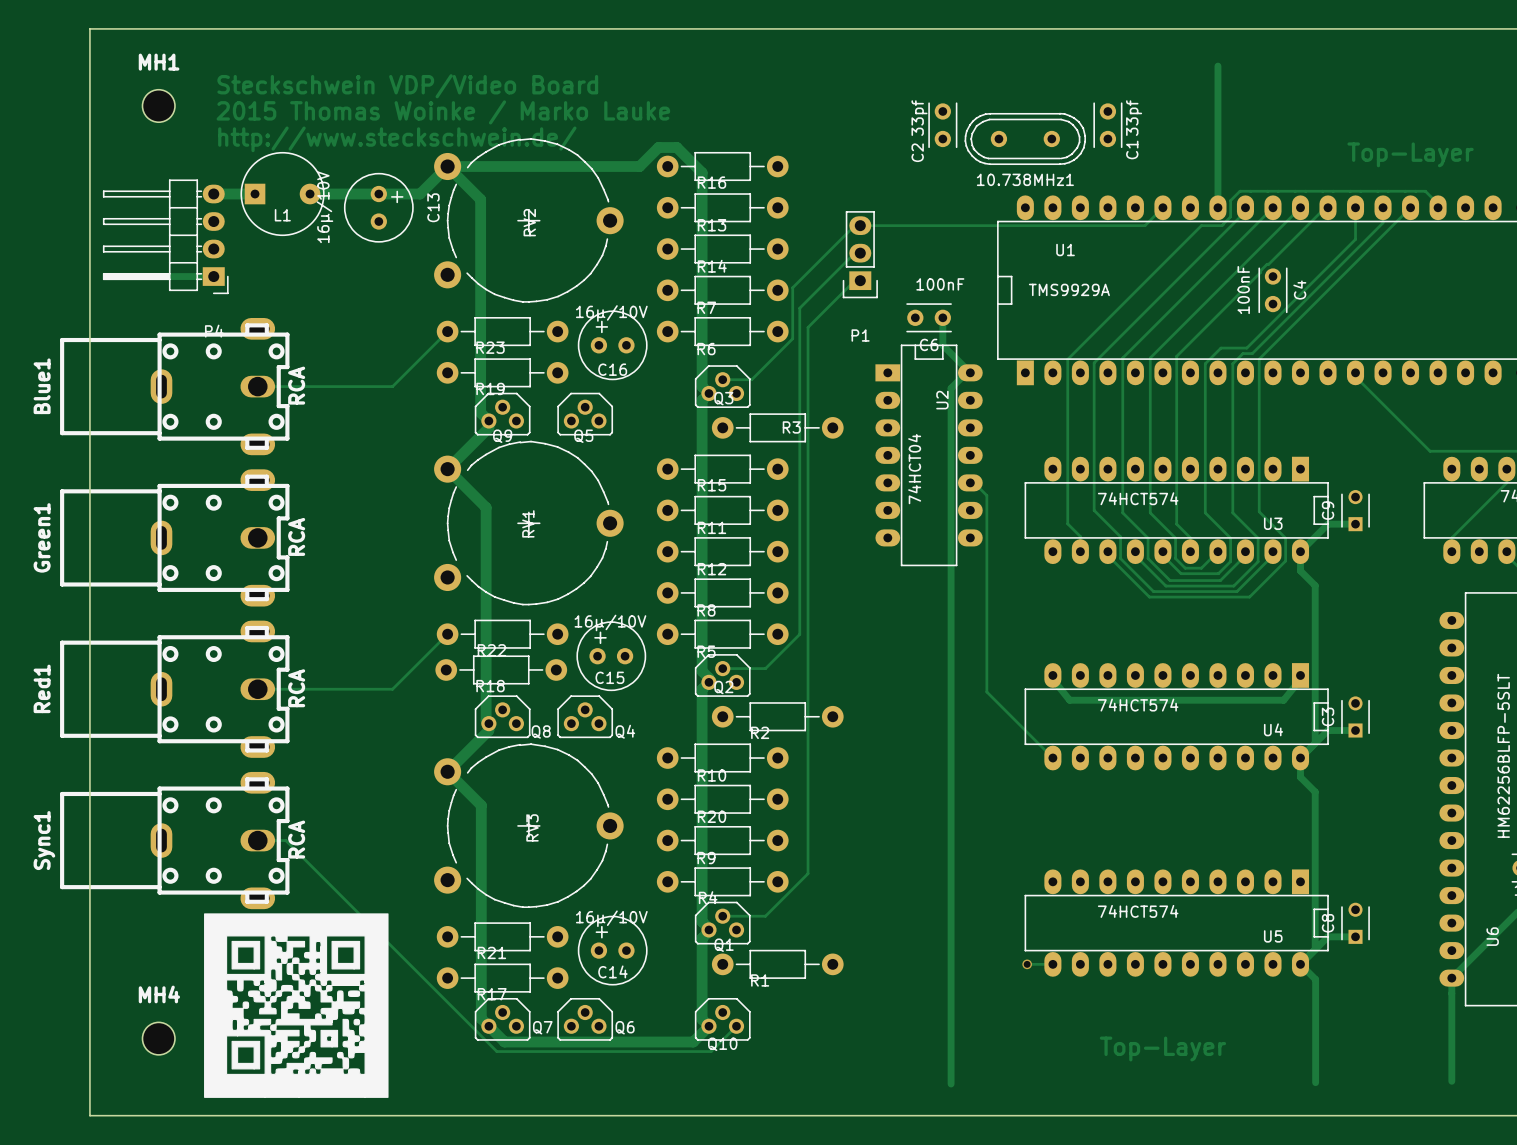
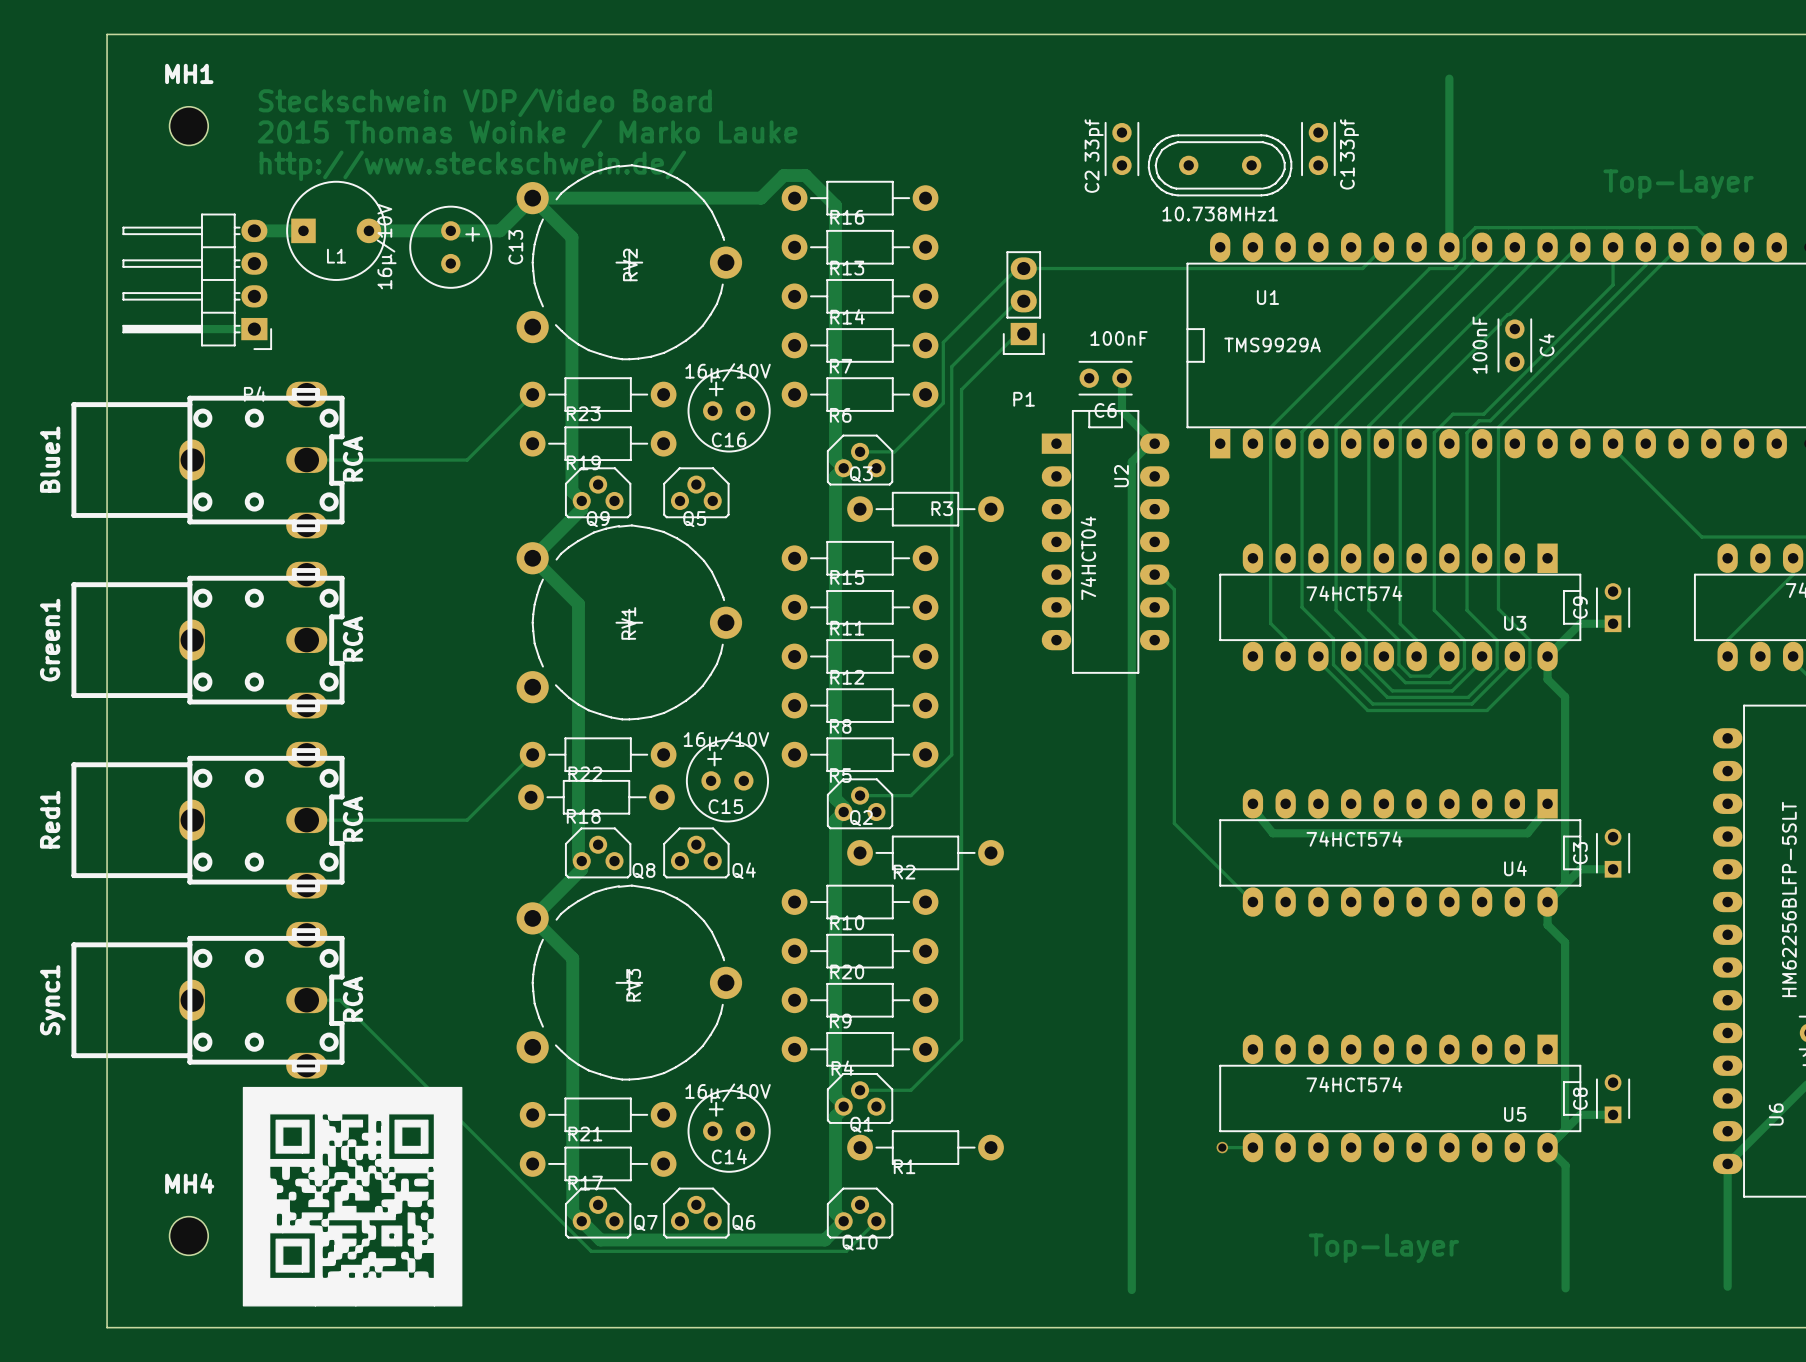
Blue1 footprint: [60, 317, 290, 456] -> [71, 381, 345, 539]
Green1 footprint: [60, 469, 290, 607] -> [71, 561, 345, 719]
Red1 footprint: [60, 620, 290, 758] -> [71, 741, 345, 899]
Sync1 footprint: [60, 771, 290, 910] -> [71, 921, 345, 1079]

